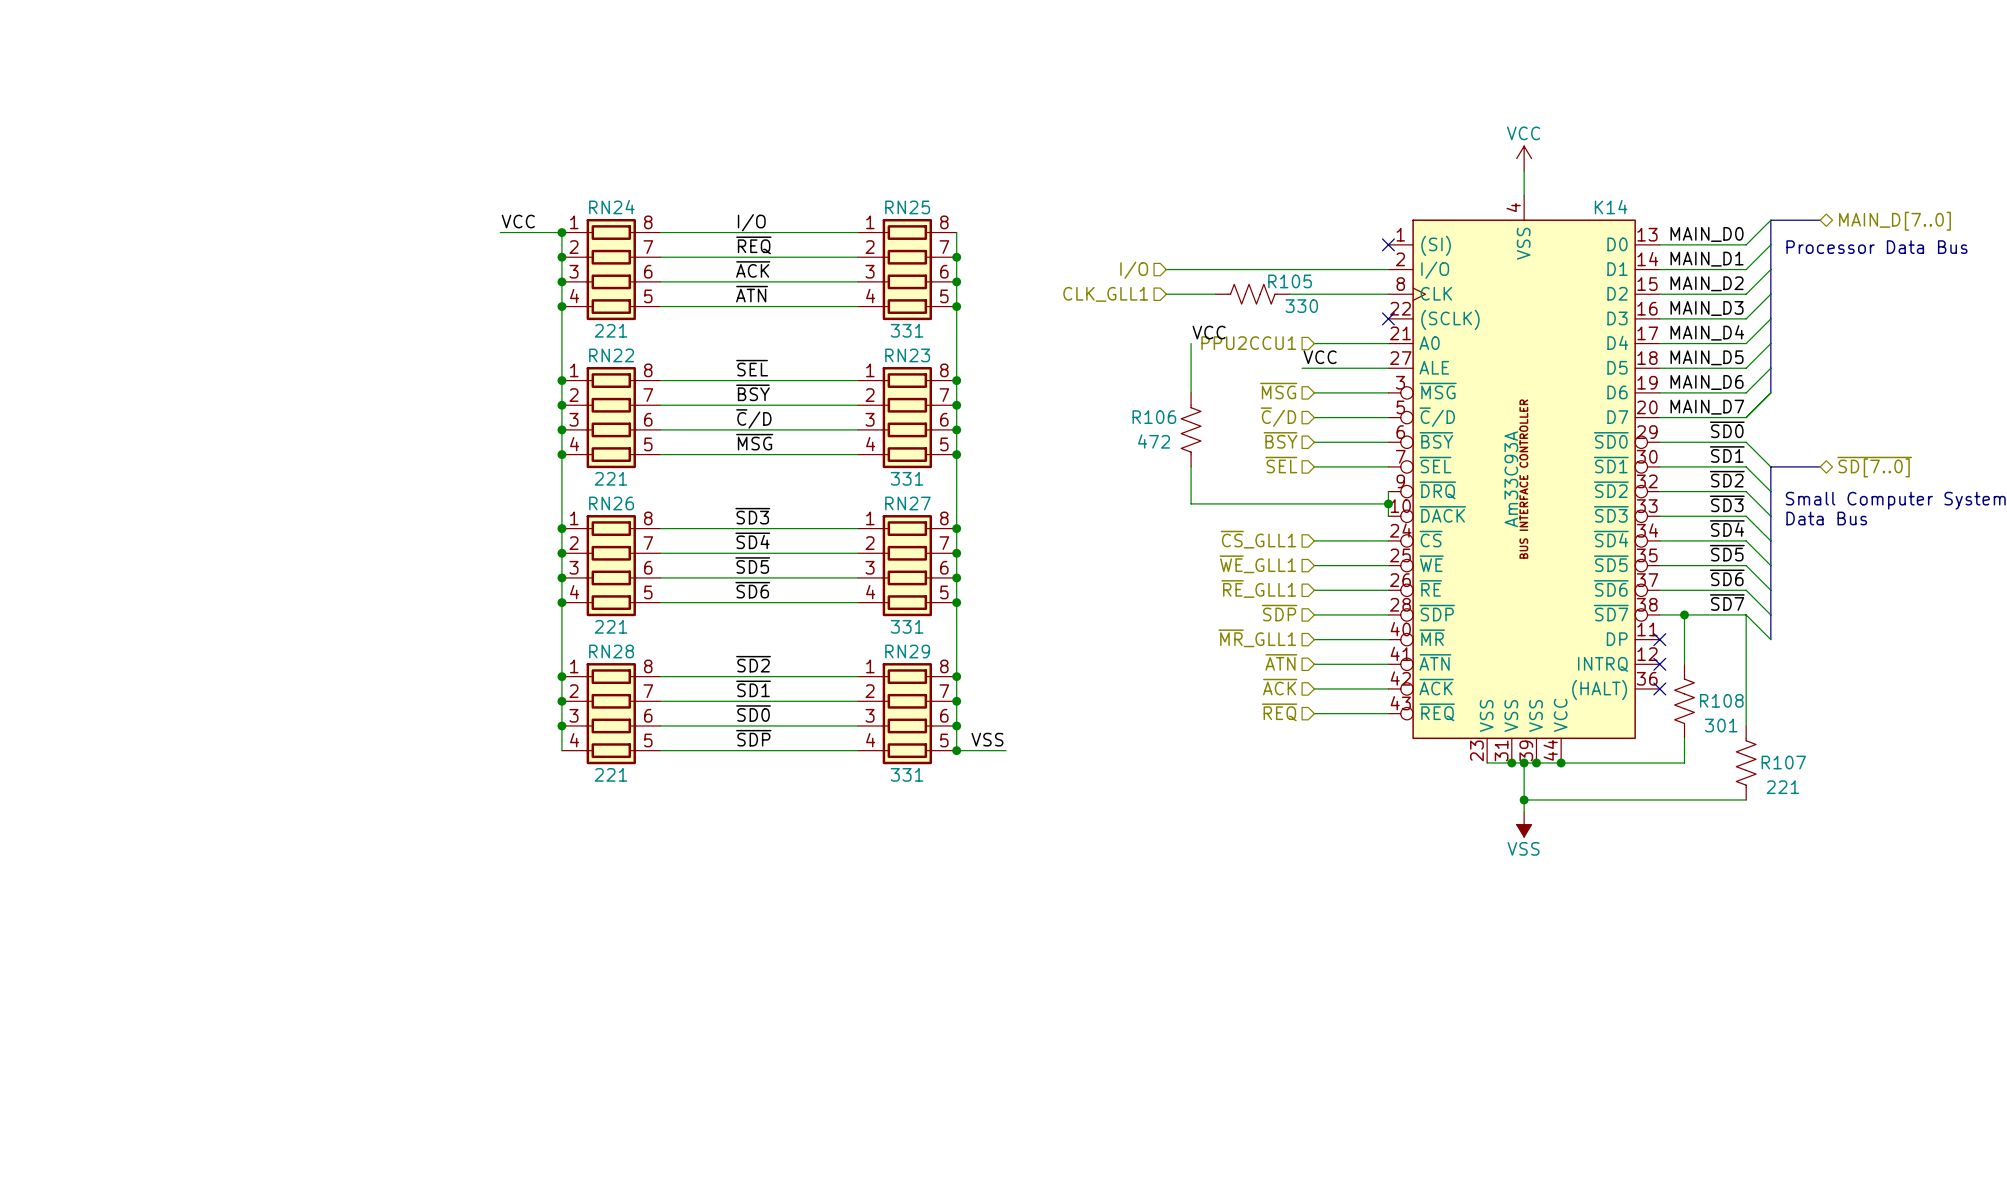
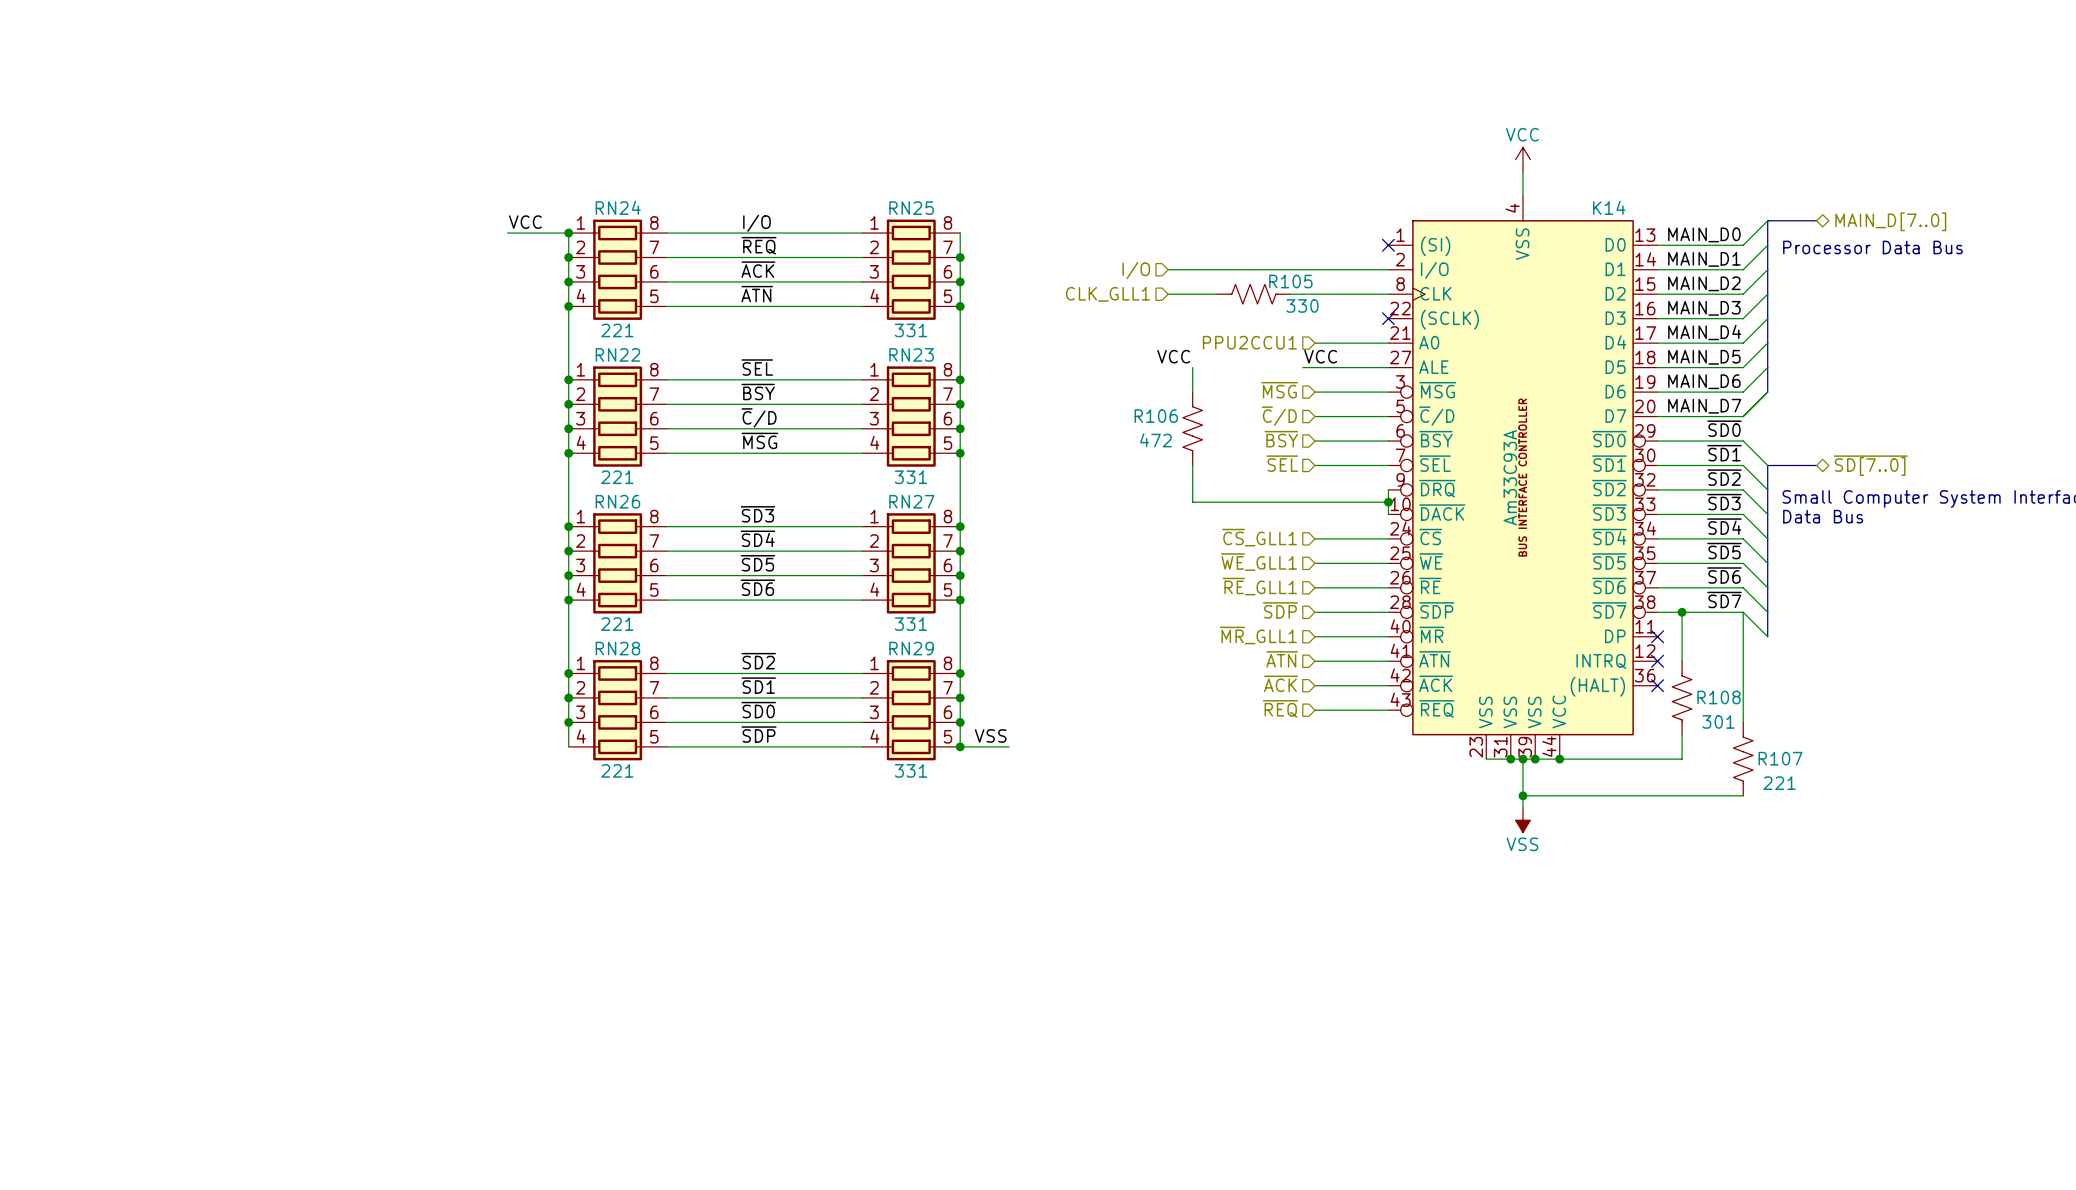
label position: VCC (1209, 332) -> VCC (1173, 356)
wire: (1191, 343) (1191, 368) -> none

